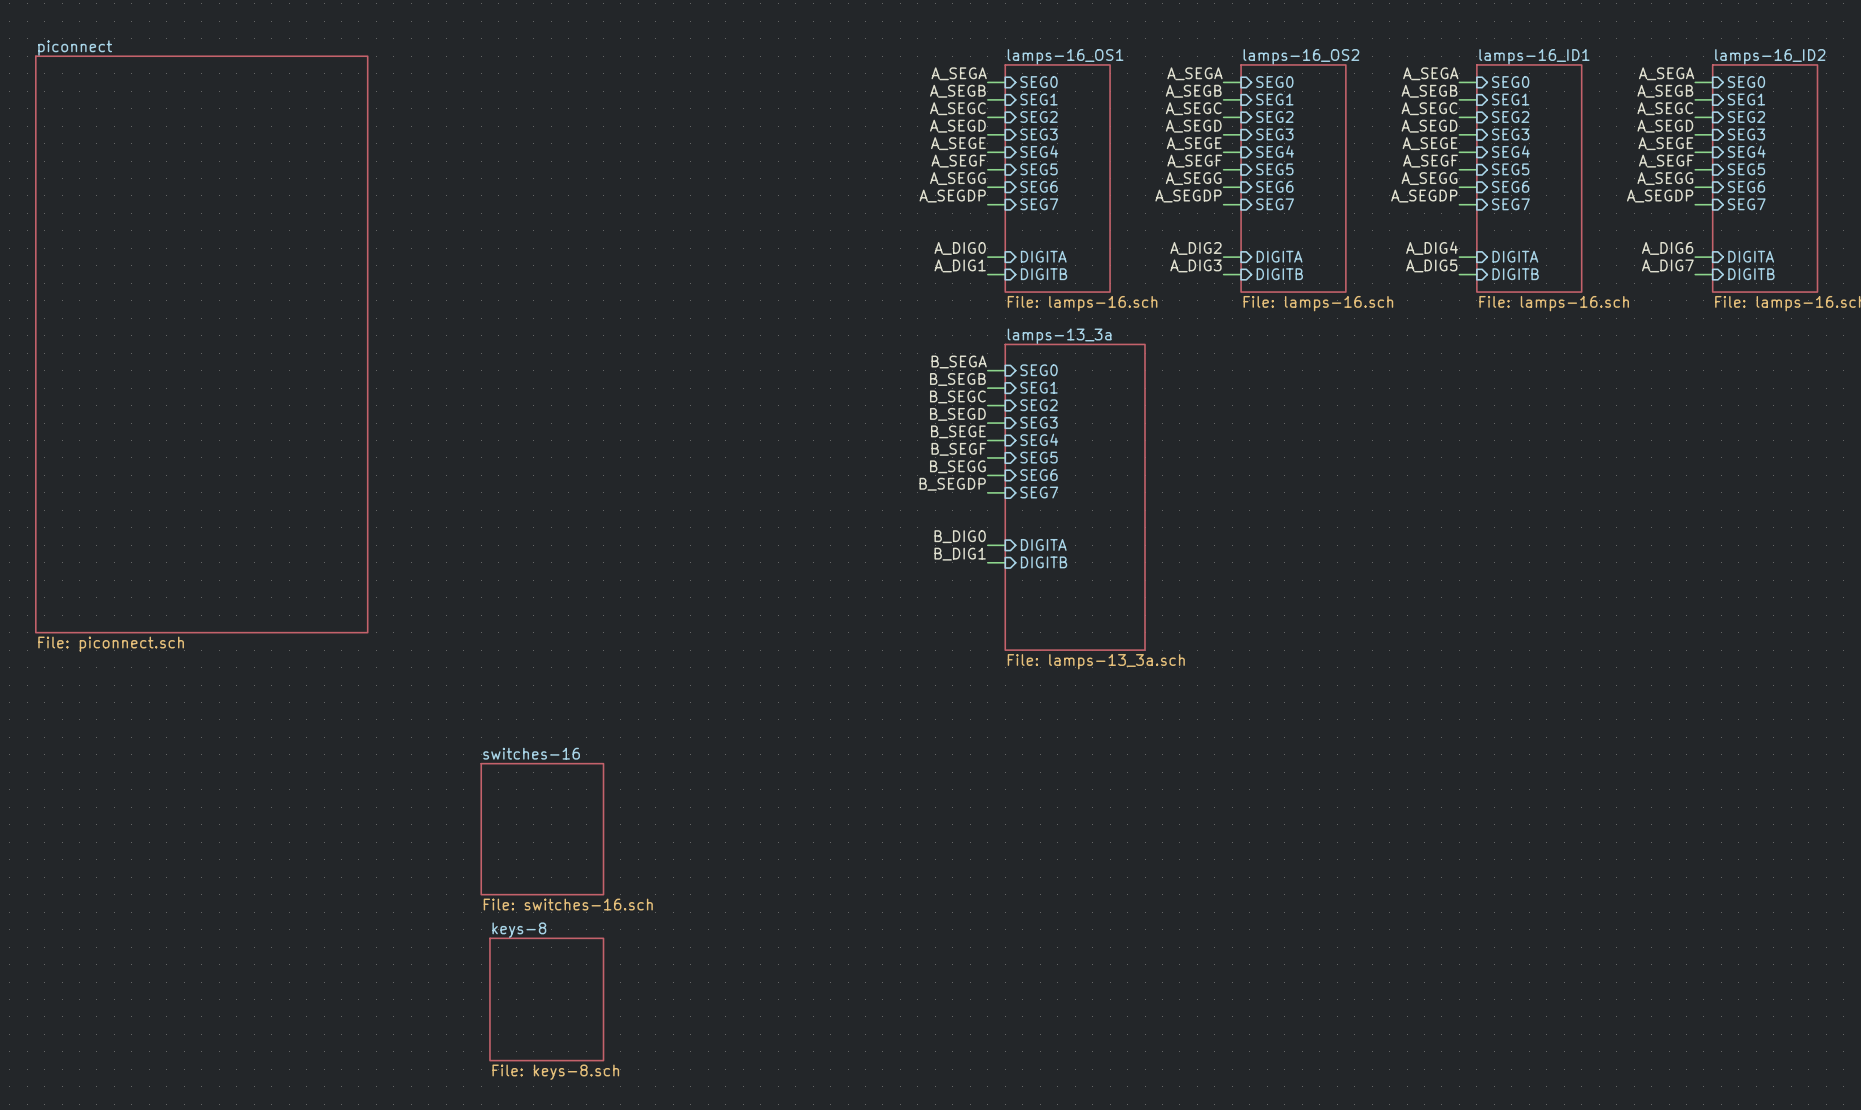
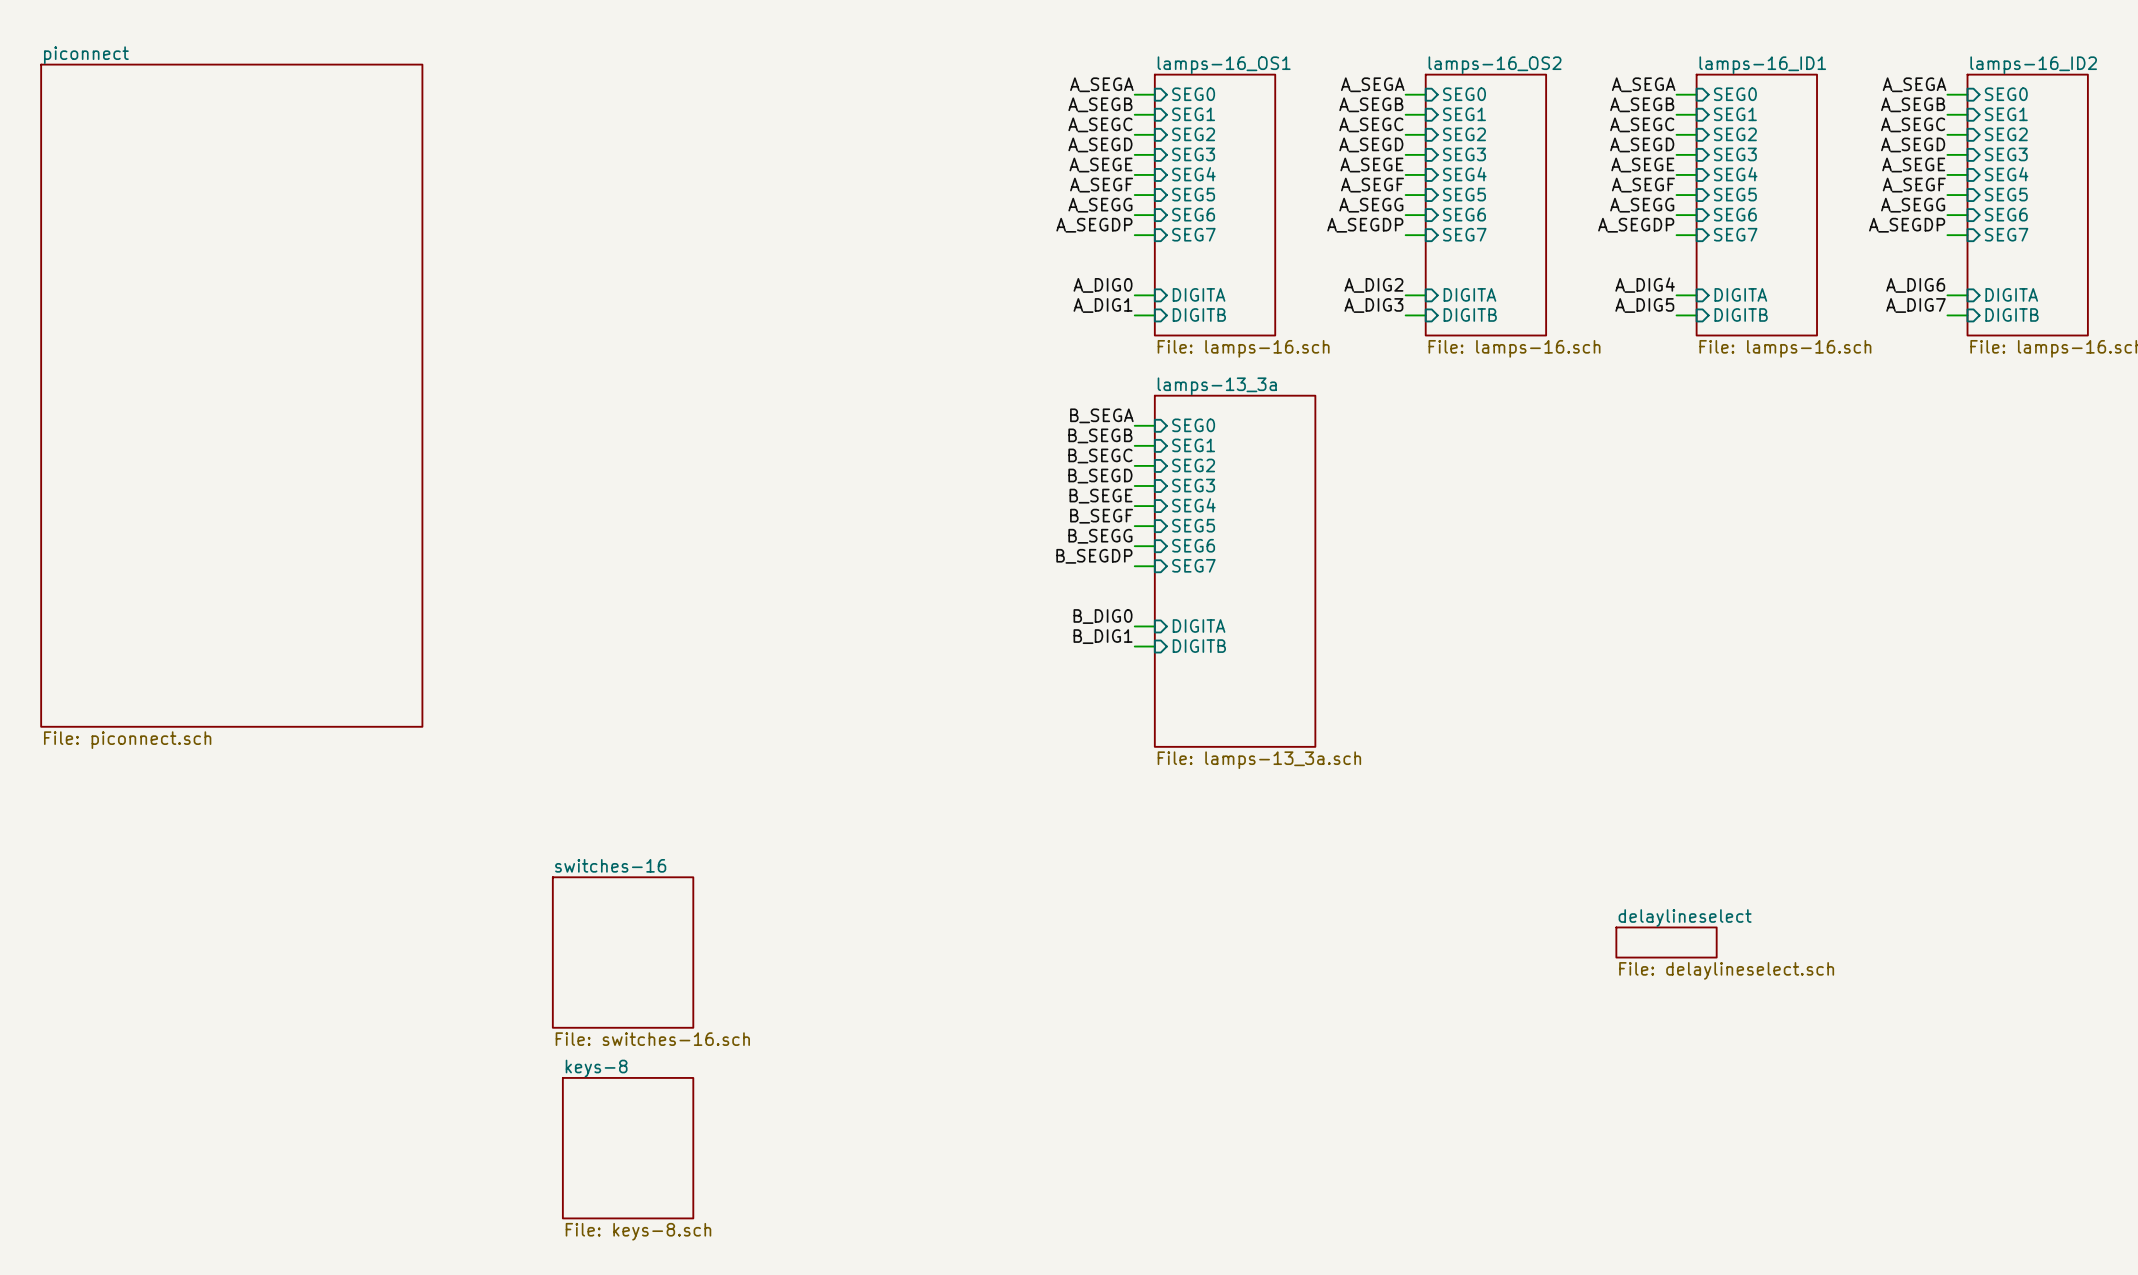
sheet delaylineselect: none -> File: delaylineselect.sch (1666, 942)

